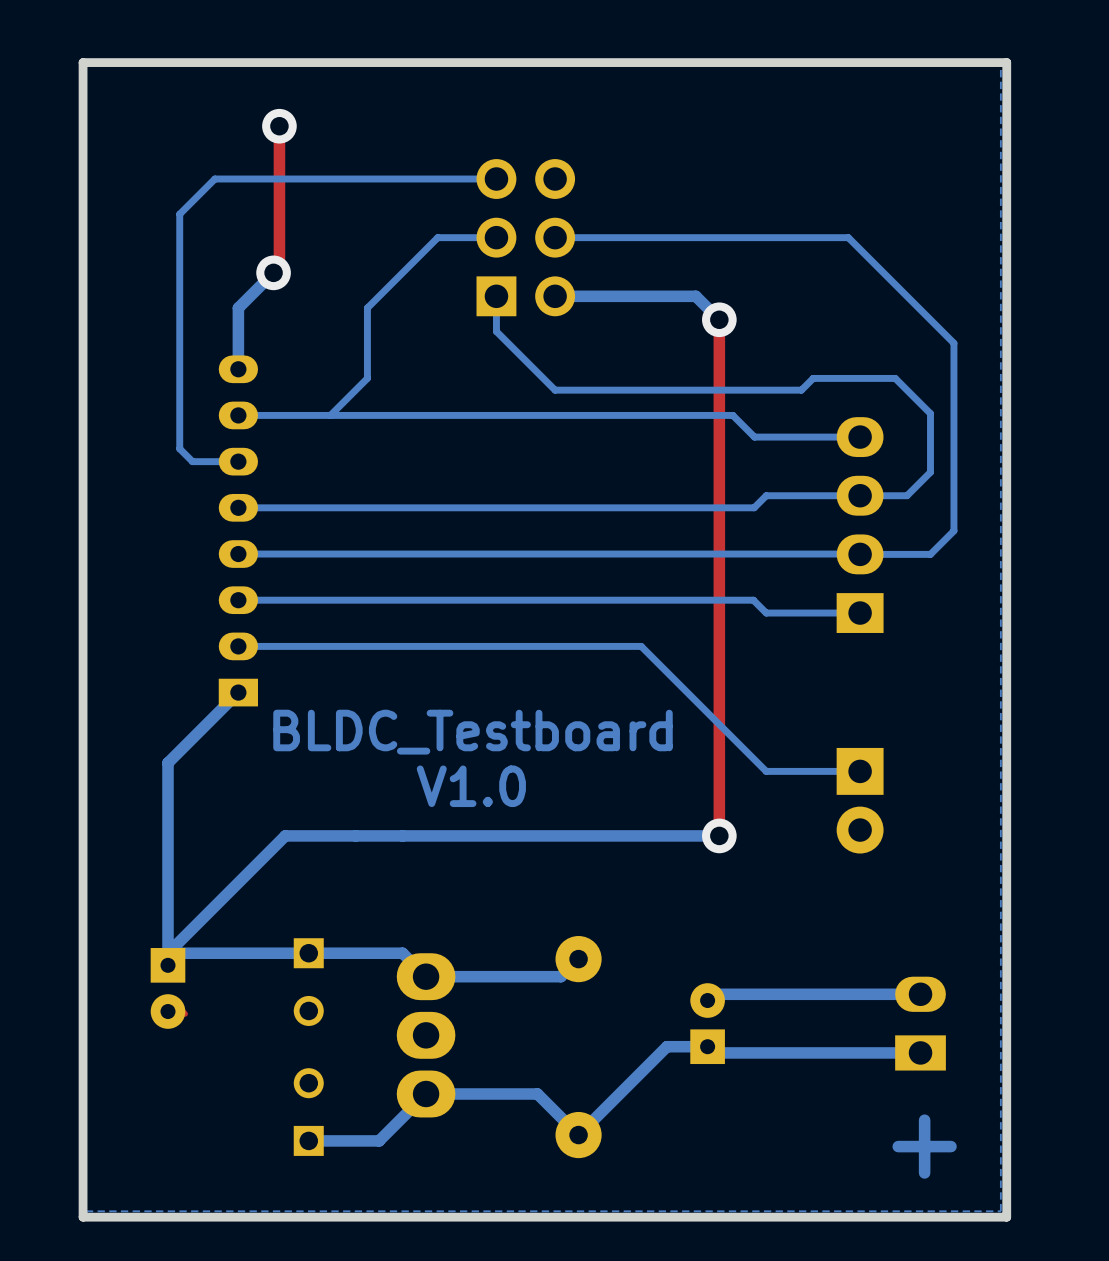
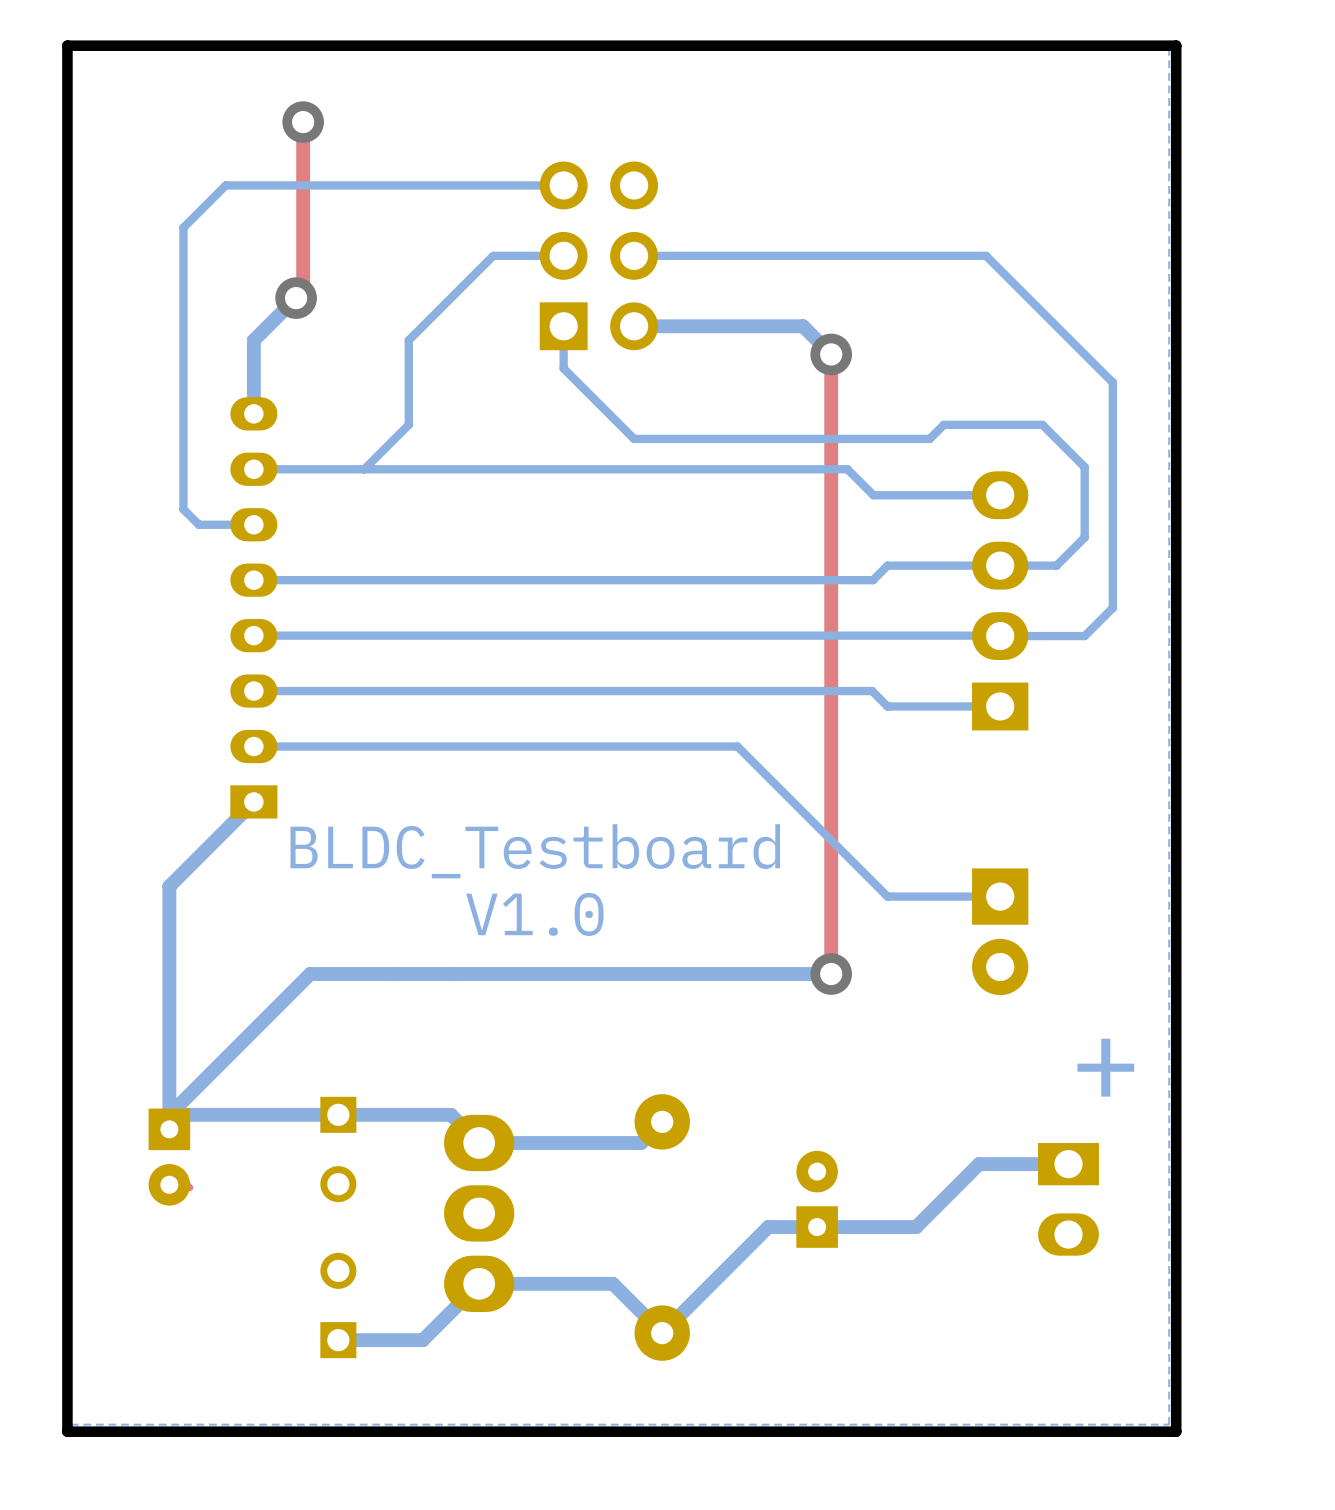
bottom track: (842, 994) (713, 994) -> (979, 1164) (916, 1227) (817, 1227)
part rotation: 0° (920, 1023) -> 180° (1068, 1199)
bottom track: (920, 1052) (713, 1052) -> none
text position: + (924, 1146) -> + (1105, 1067)

